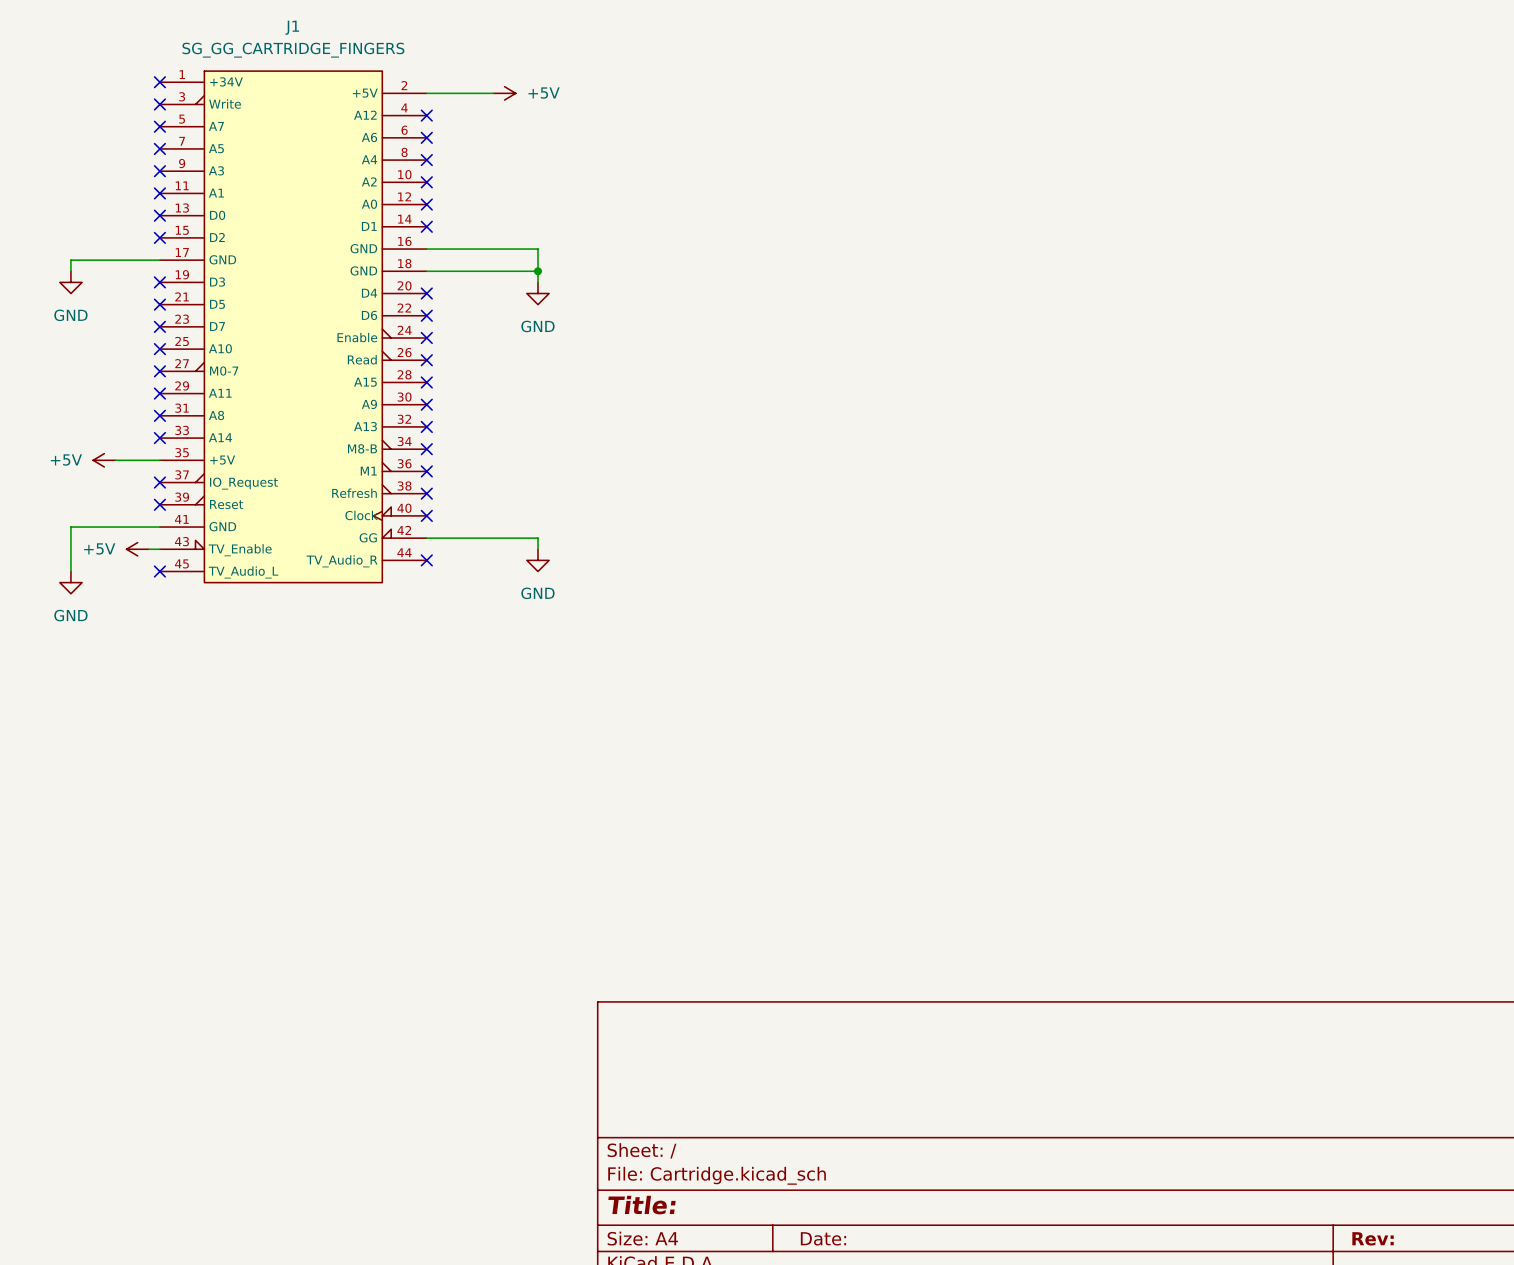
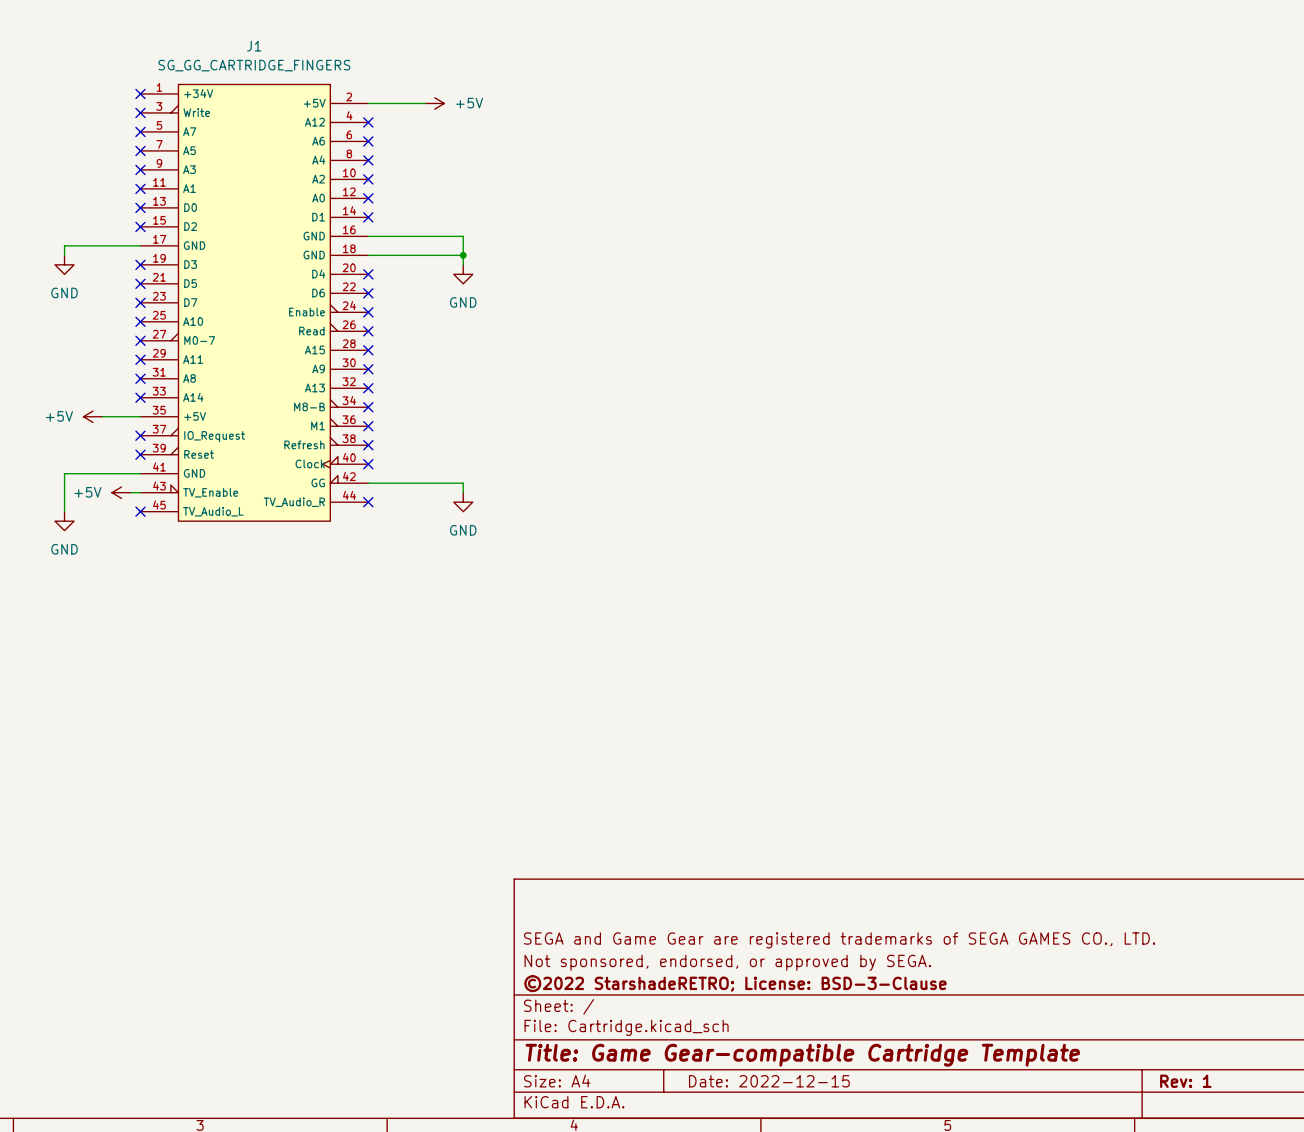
title block: none -> SEGA and Game Gear are registered trademarks of SEGA GAMES CO., LTD. (839, 940)
title block: none -> Not sponsored, endorsed, or approved by SEGA. (727, 962)
title block: none -> ©2022 StarshadeRETRO; License: BSD-3-Clause (735, 983)
title block: Title: (641, 1205) -> Title: Game Gear-compatible Cartridge Template (802, 1055)
title block: Date: (823, 1238) -> Date: 2022-12-15 (769, 1081)
title block: Rev: (1373, 1238) -> Rev: 1 (1185, 1081)

